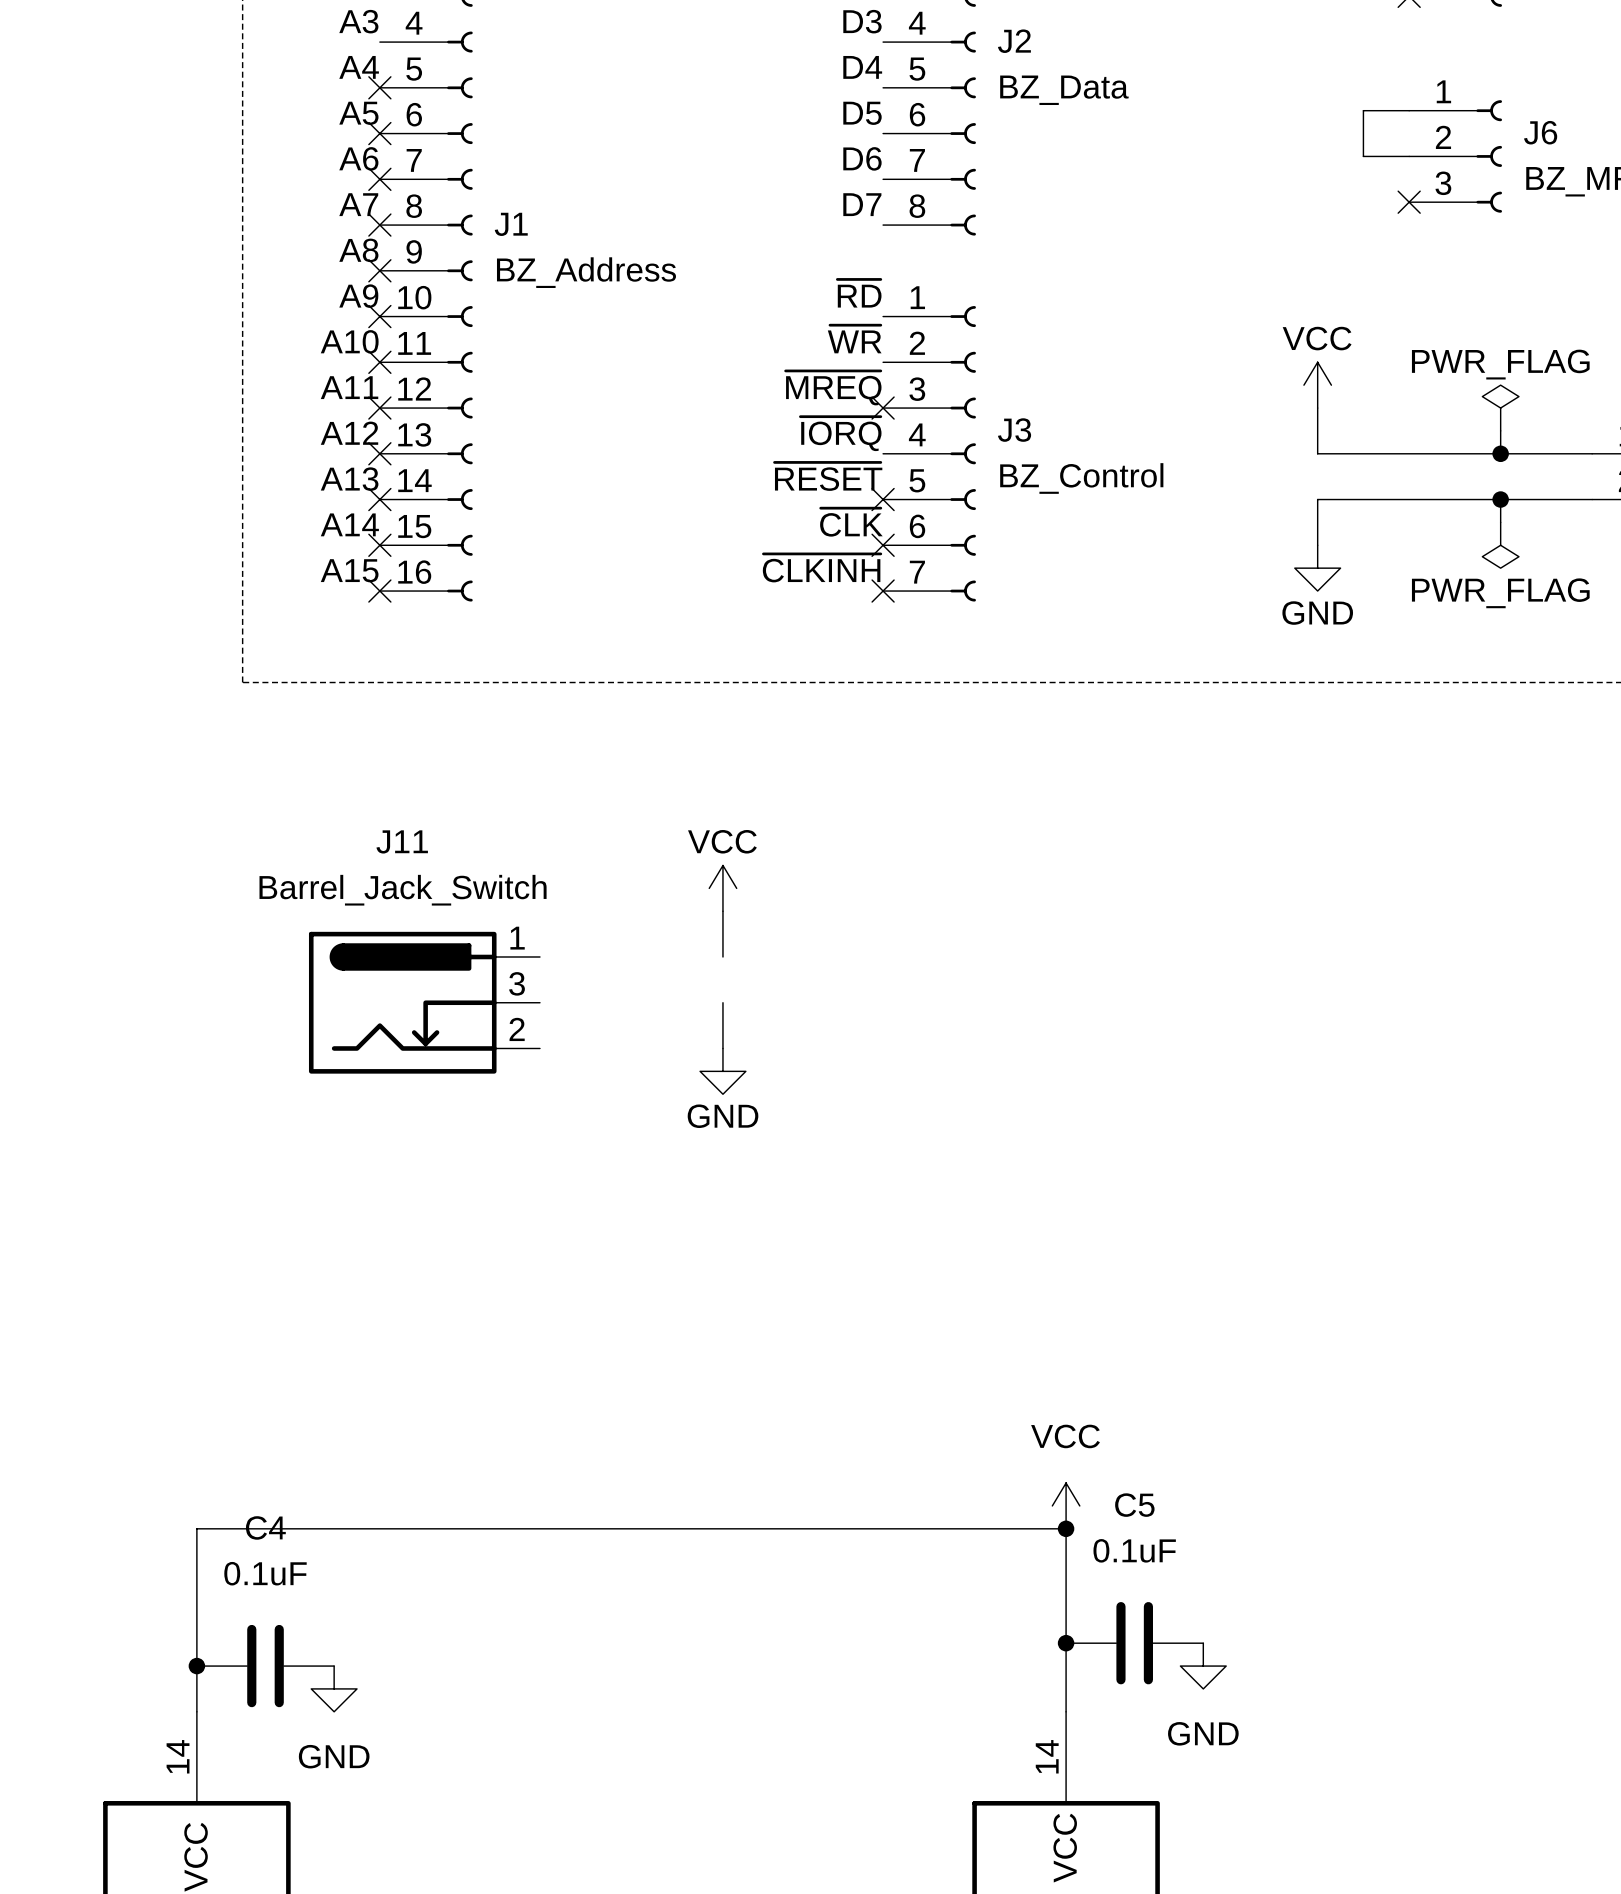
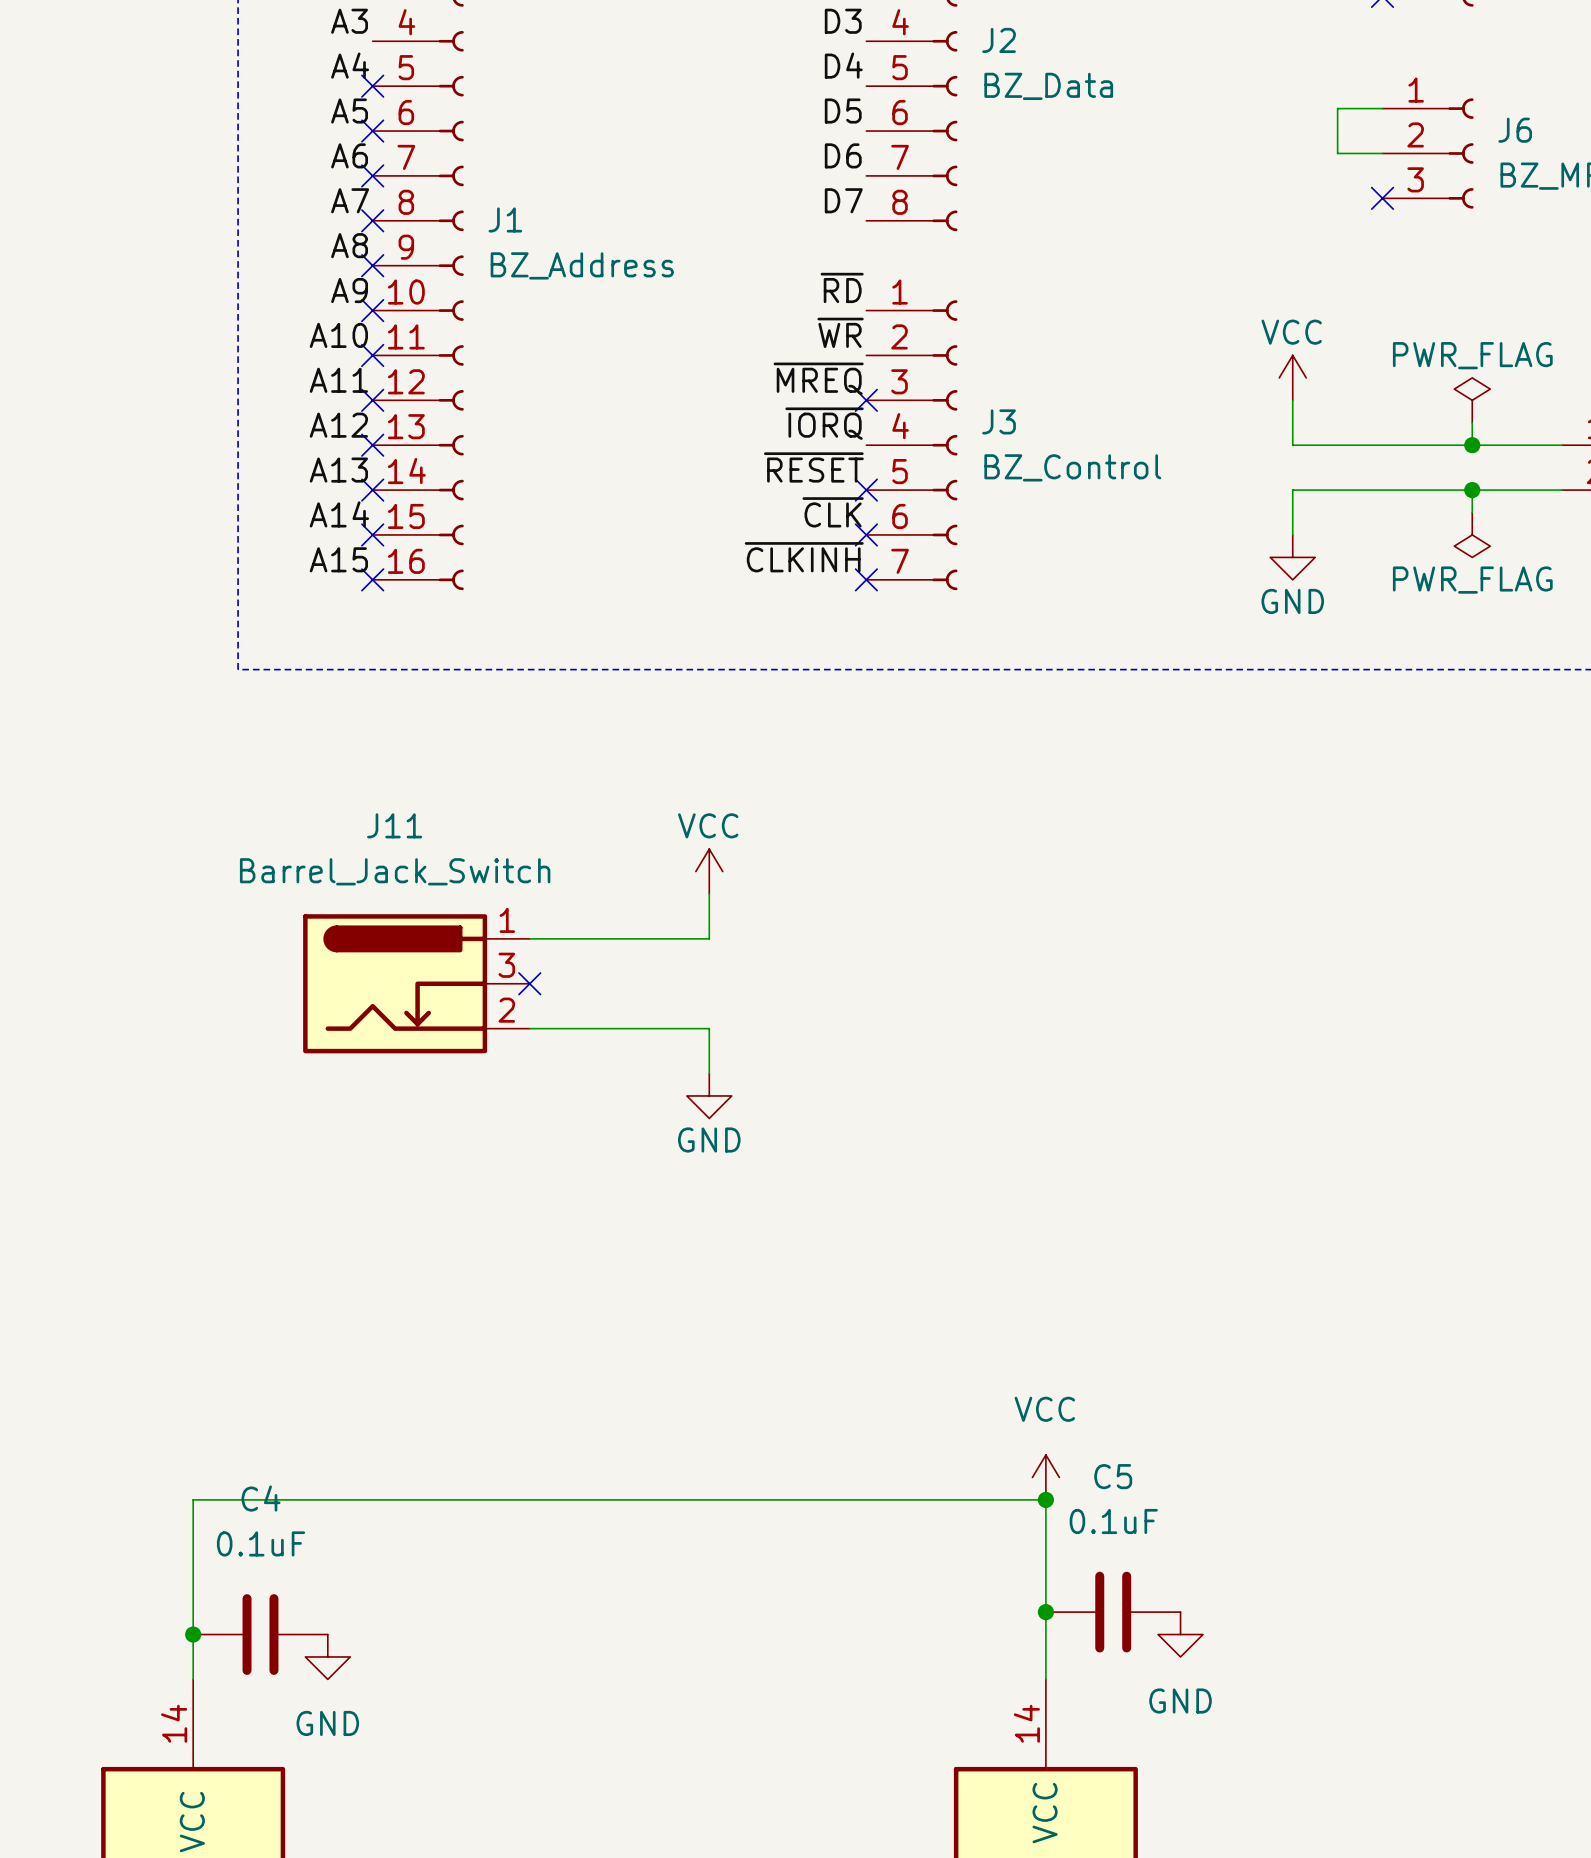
wire: none -> (529, 938) (709, 938)
no-connect mark: none -> (529, 983)
wire: (722, 1002) (722, 1048) -> none
wire: none -> (529, 1028) (709, 1028) (709, 1073)
power symbol position: GND (722, 1071) -> GND (709, 1095)

